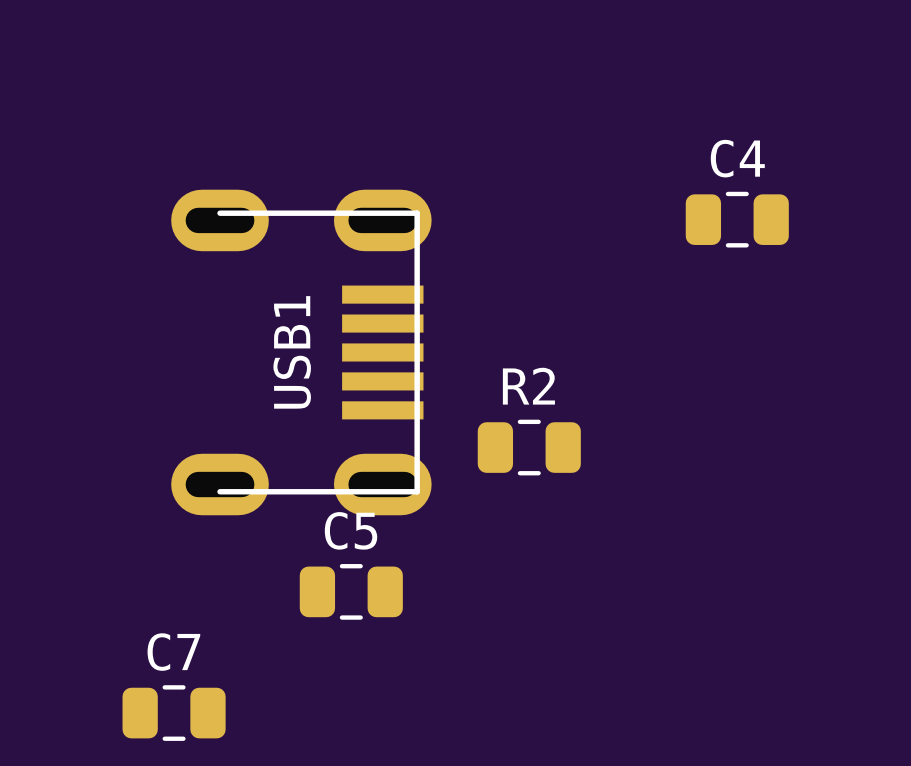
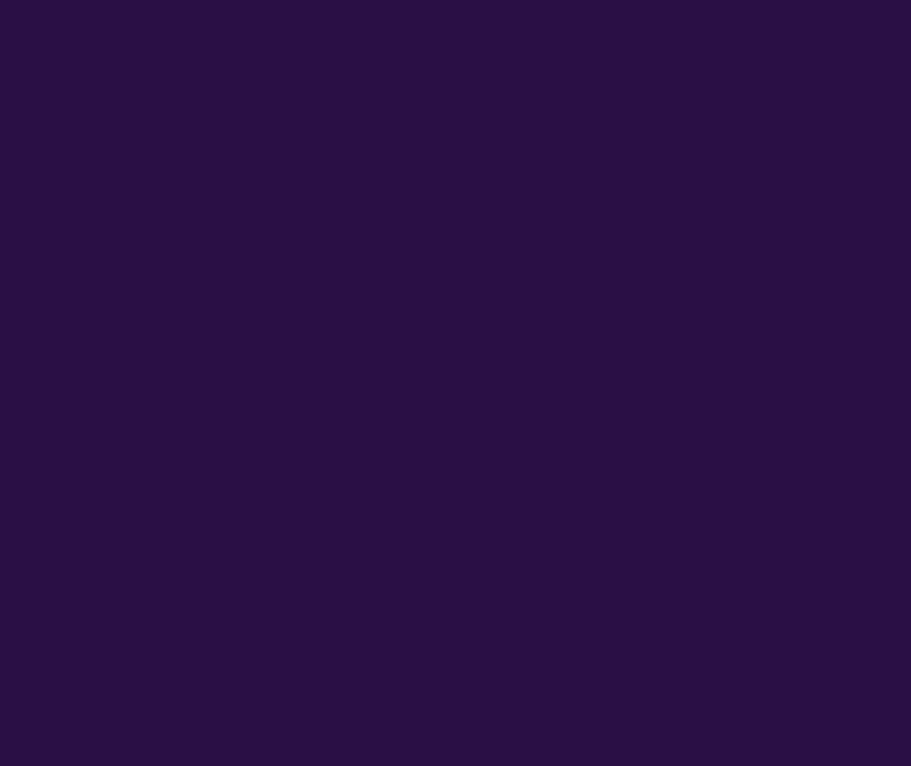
C4: (737, 219) -> none
USB1: (301, 352) -> none
R2: (529, 447) -> none
C5: (351, 591) -> none
C7: (174, 713) -> none

